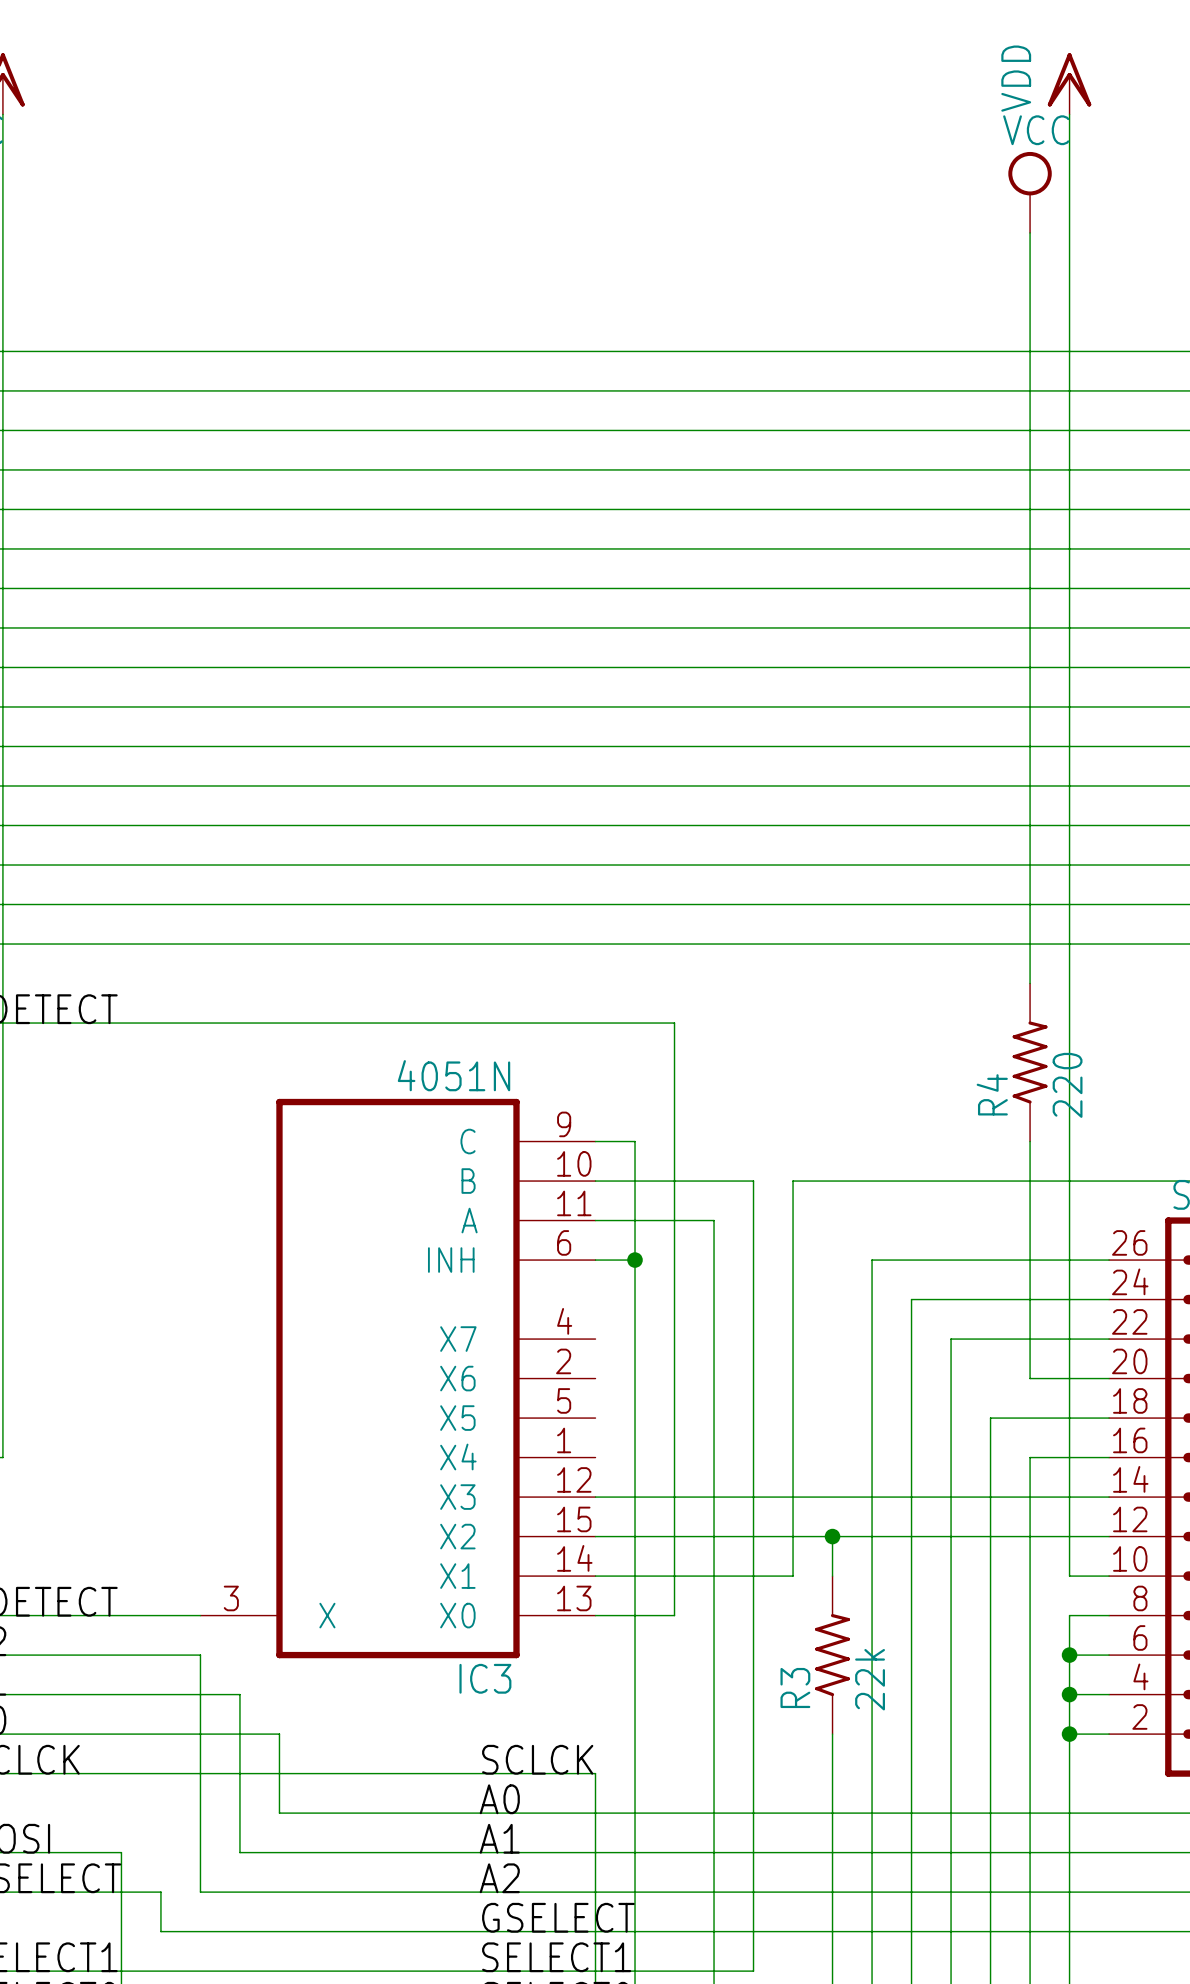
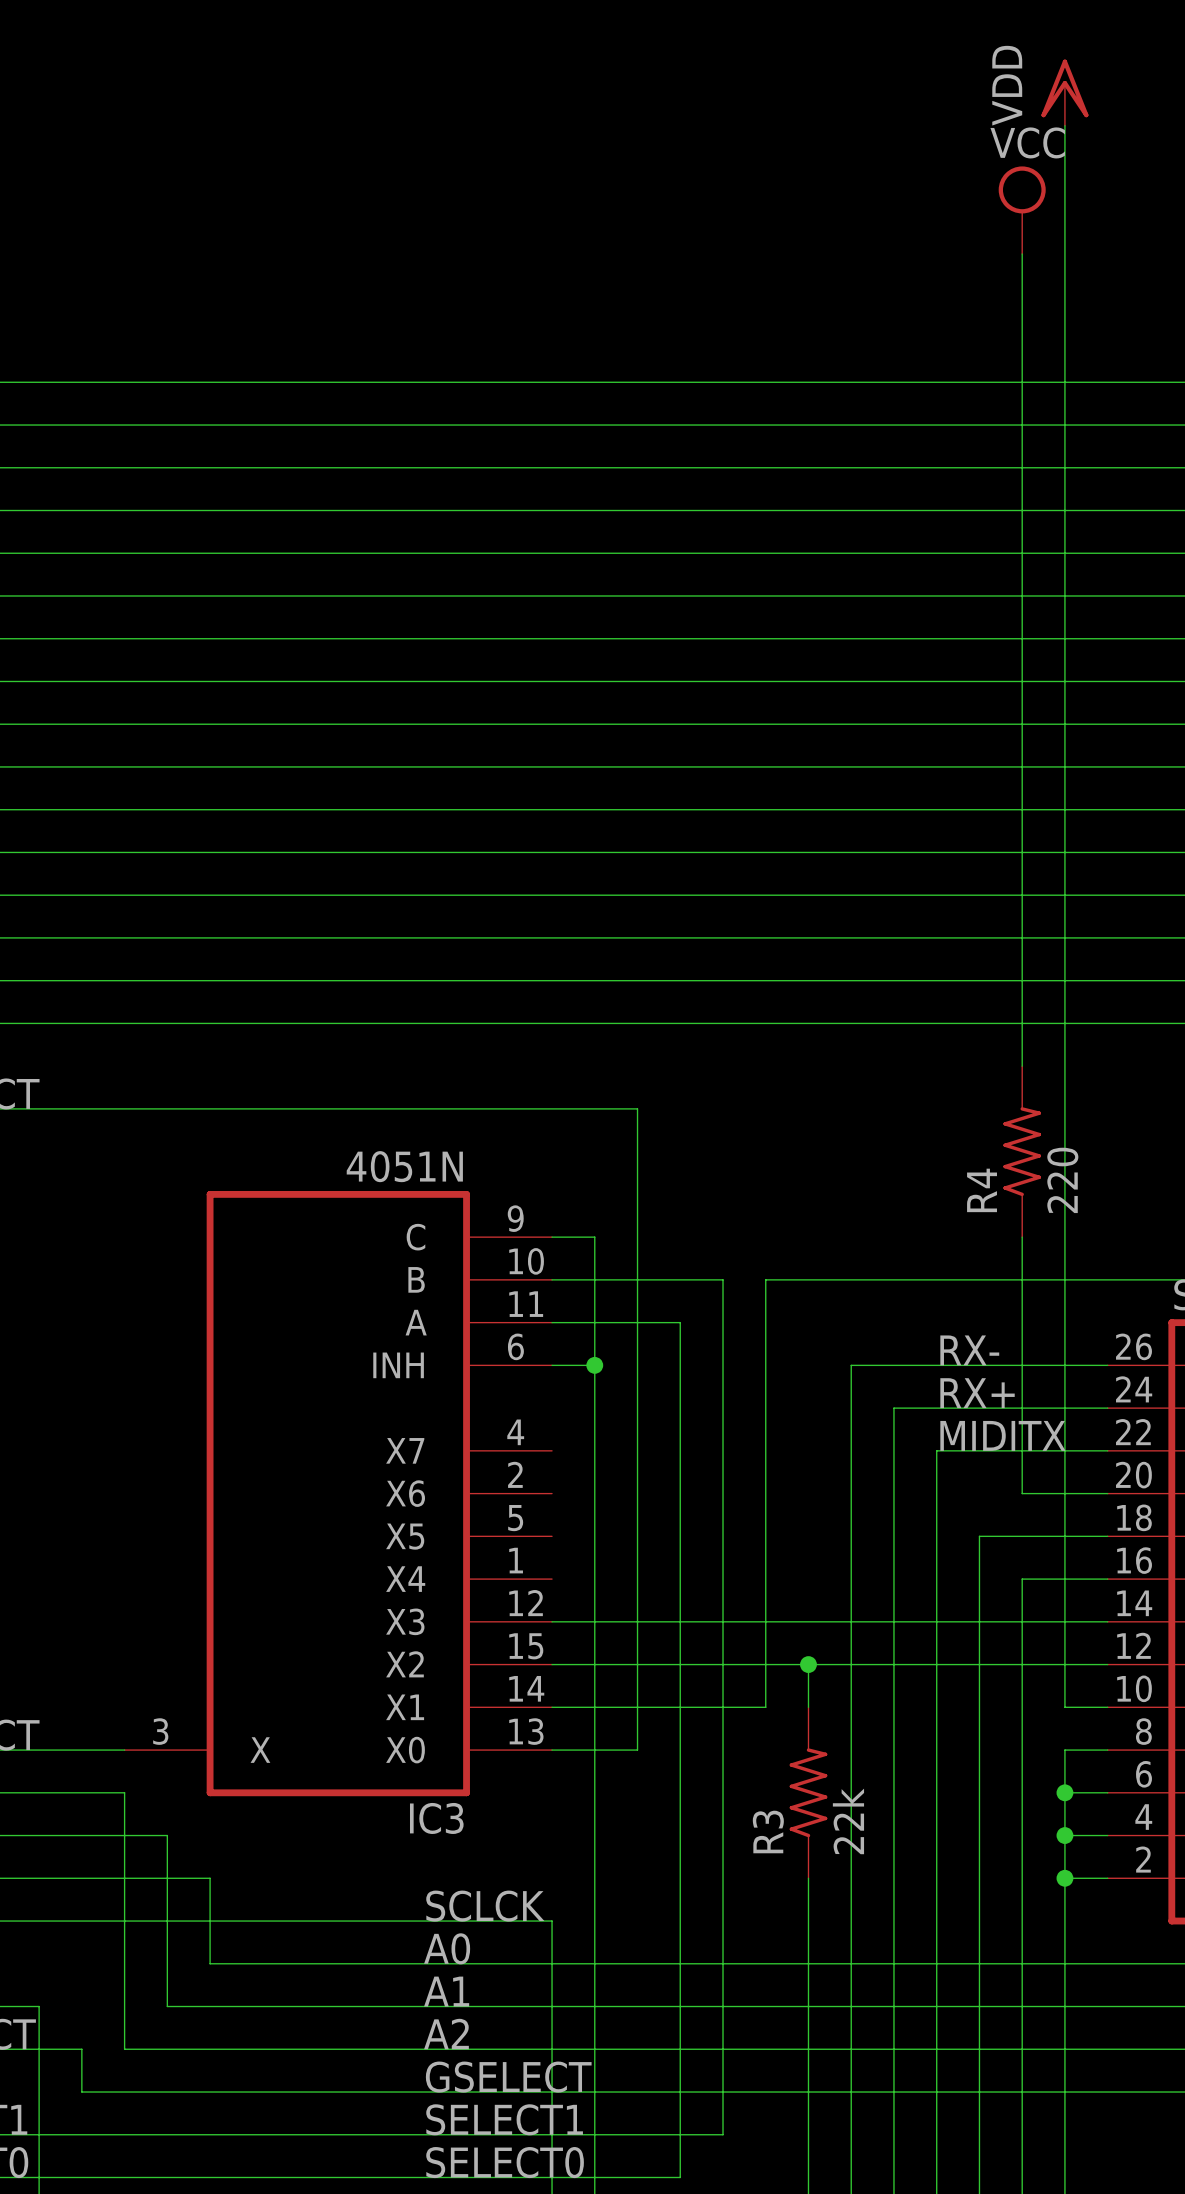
label: none -> RX- (969, 1350)
label: none -> RX+ (977, 1393)
label: none -> MIDITX (1002, 1435)

